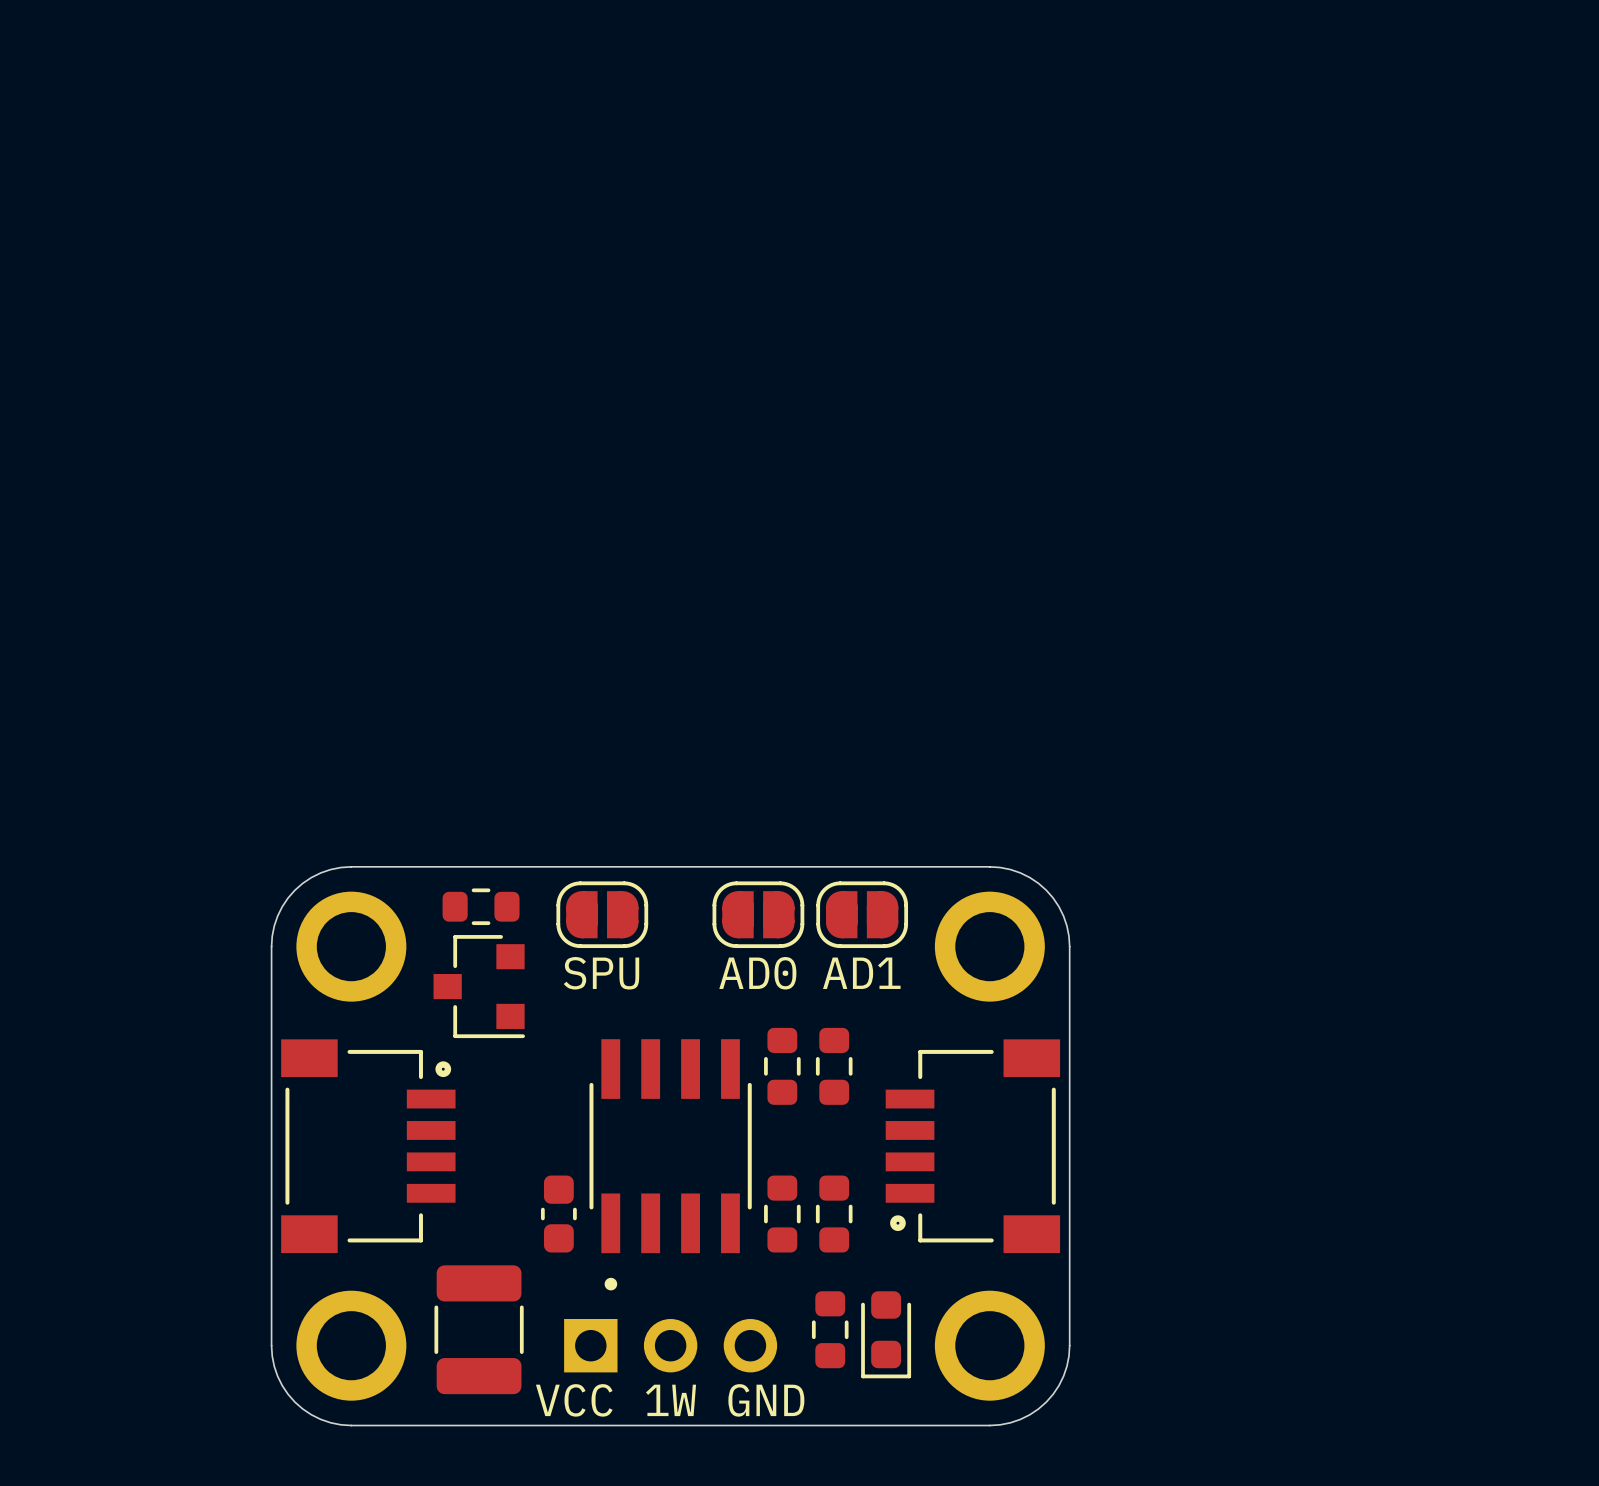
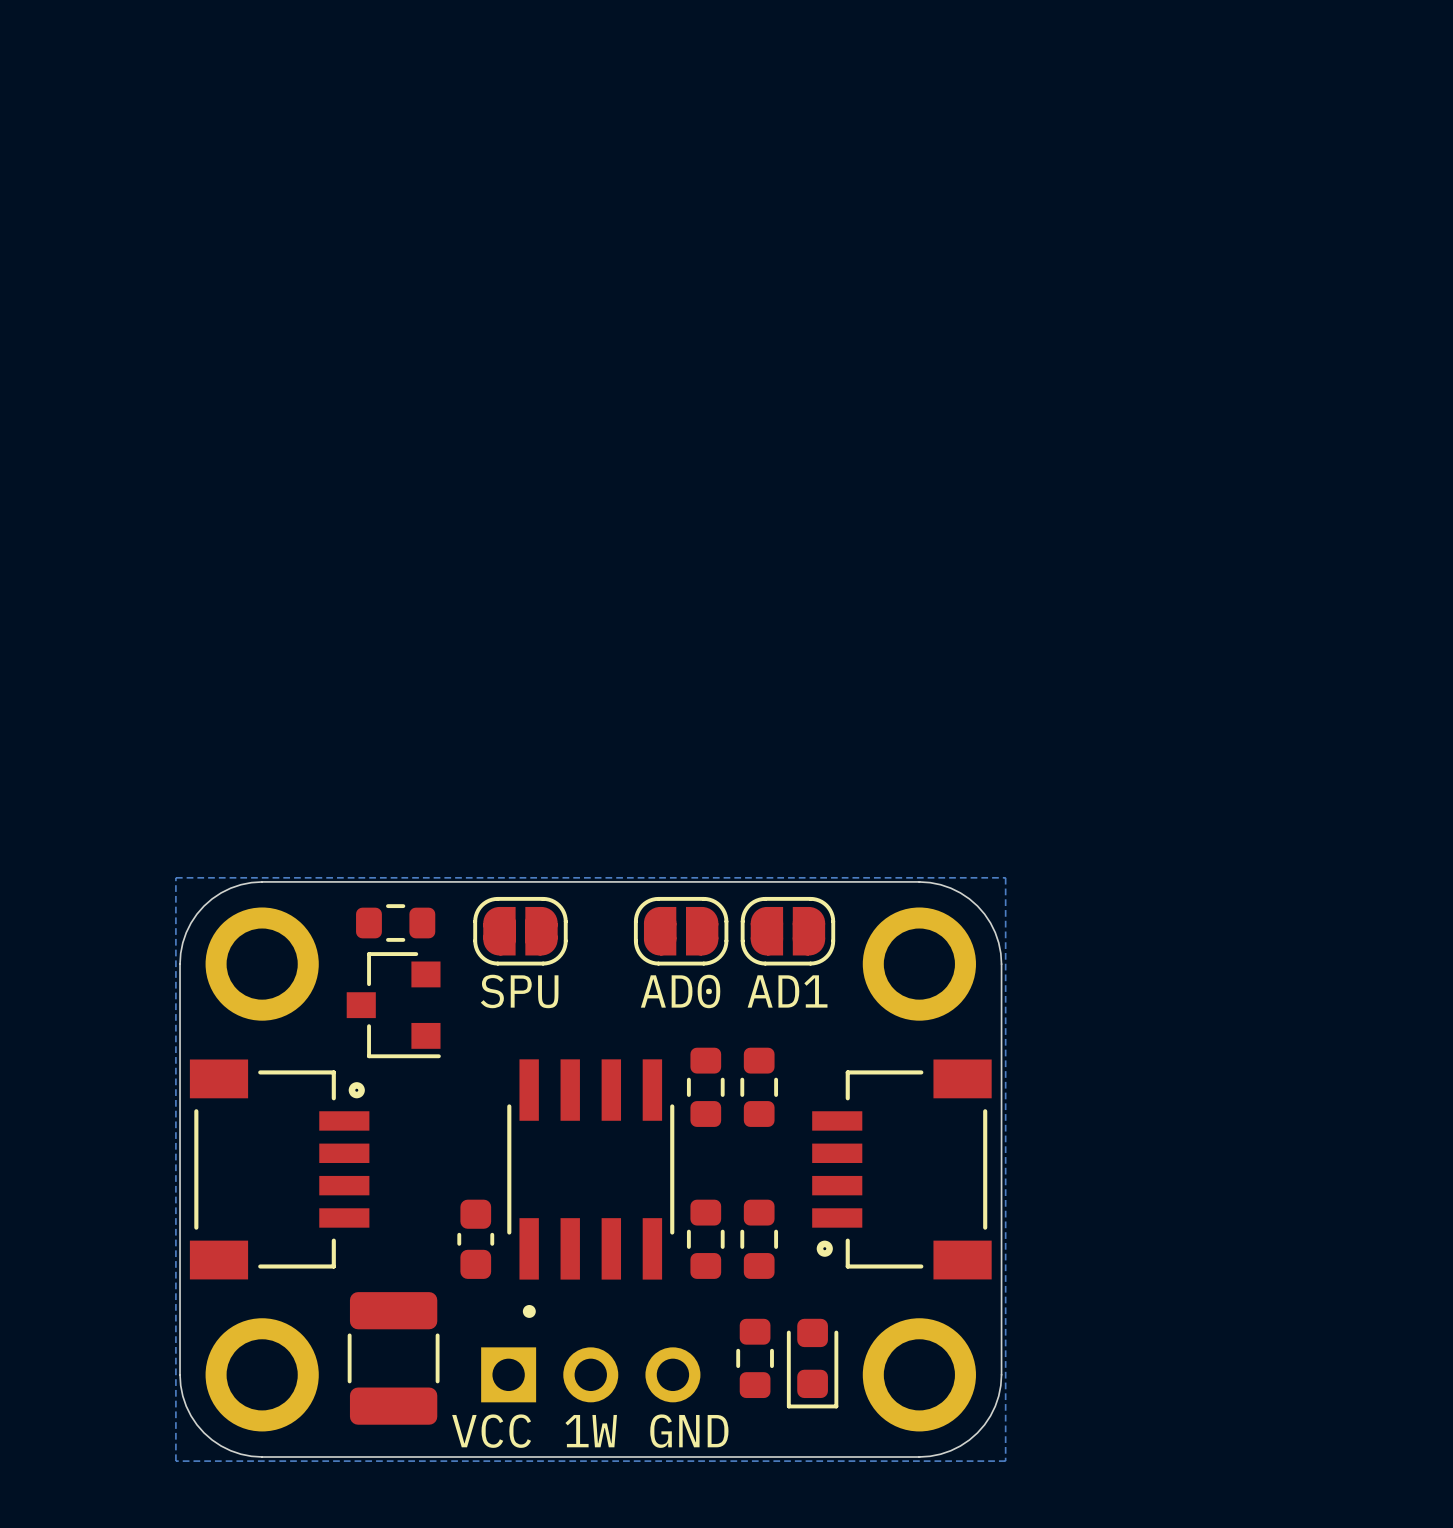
bottom zone outline: none -> (175, 877) (175, 1461) (1005, 1461) (1005, 877) (175, 877)

